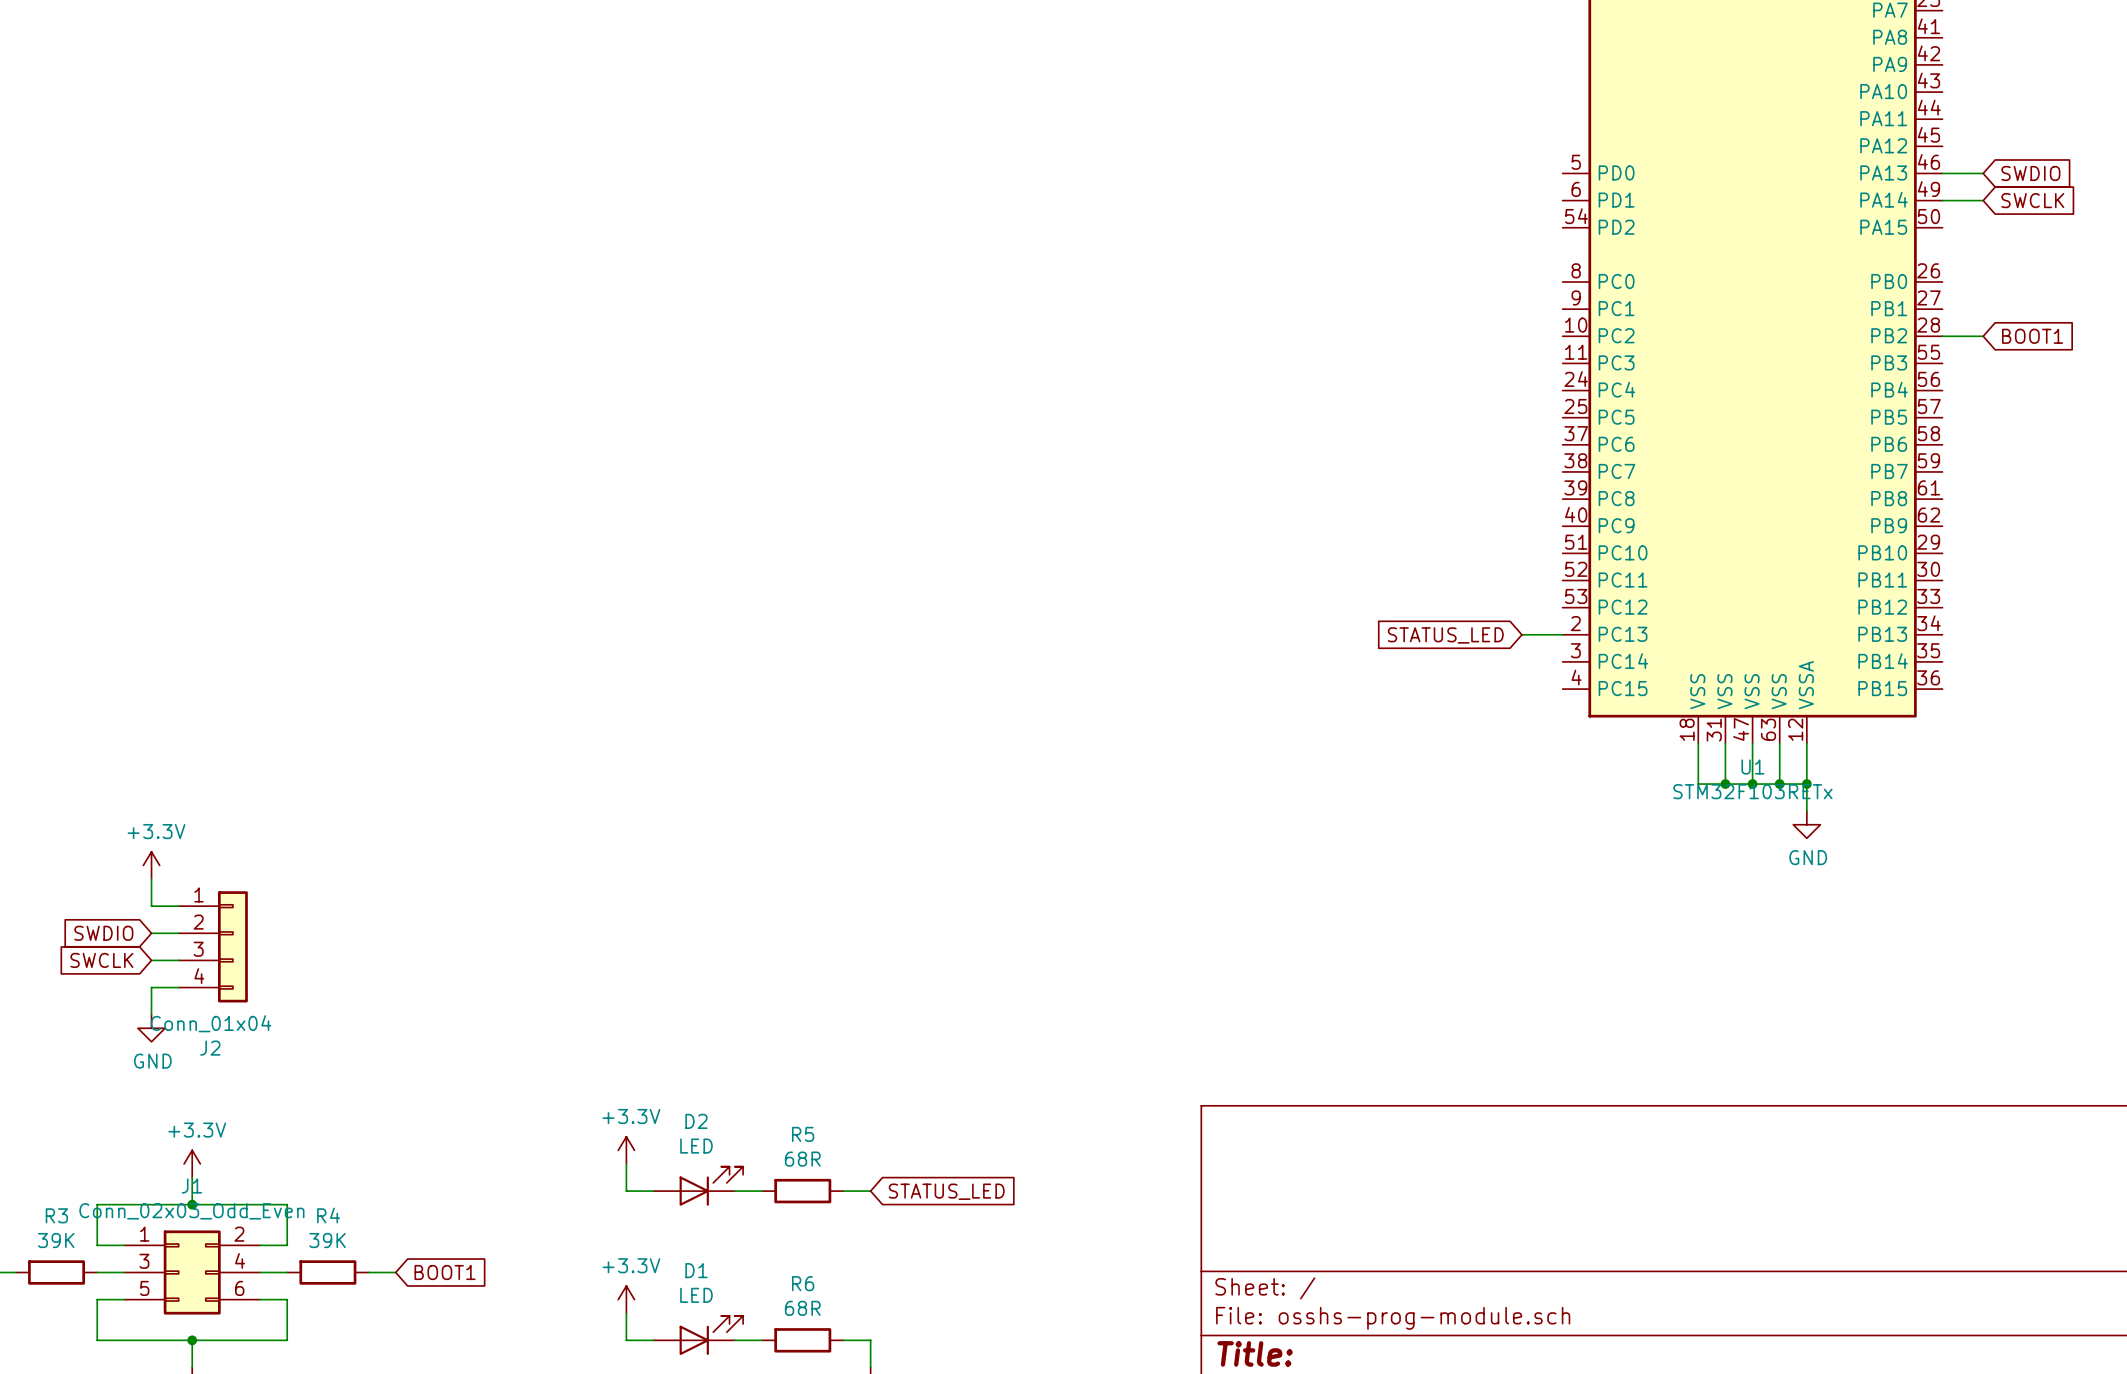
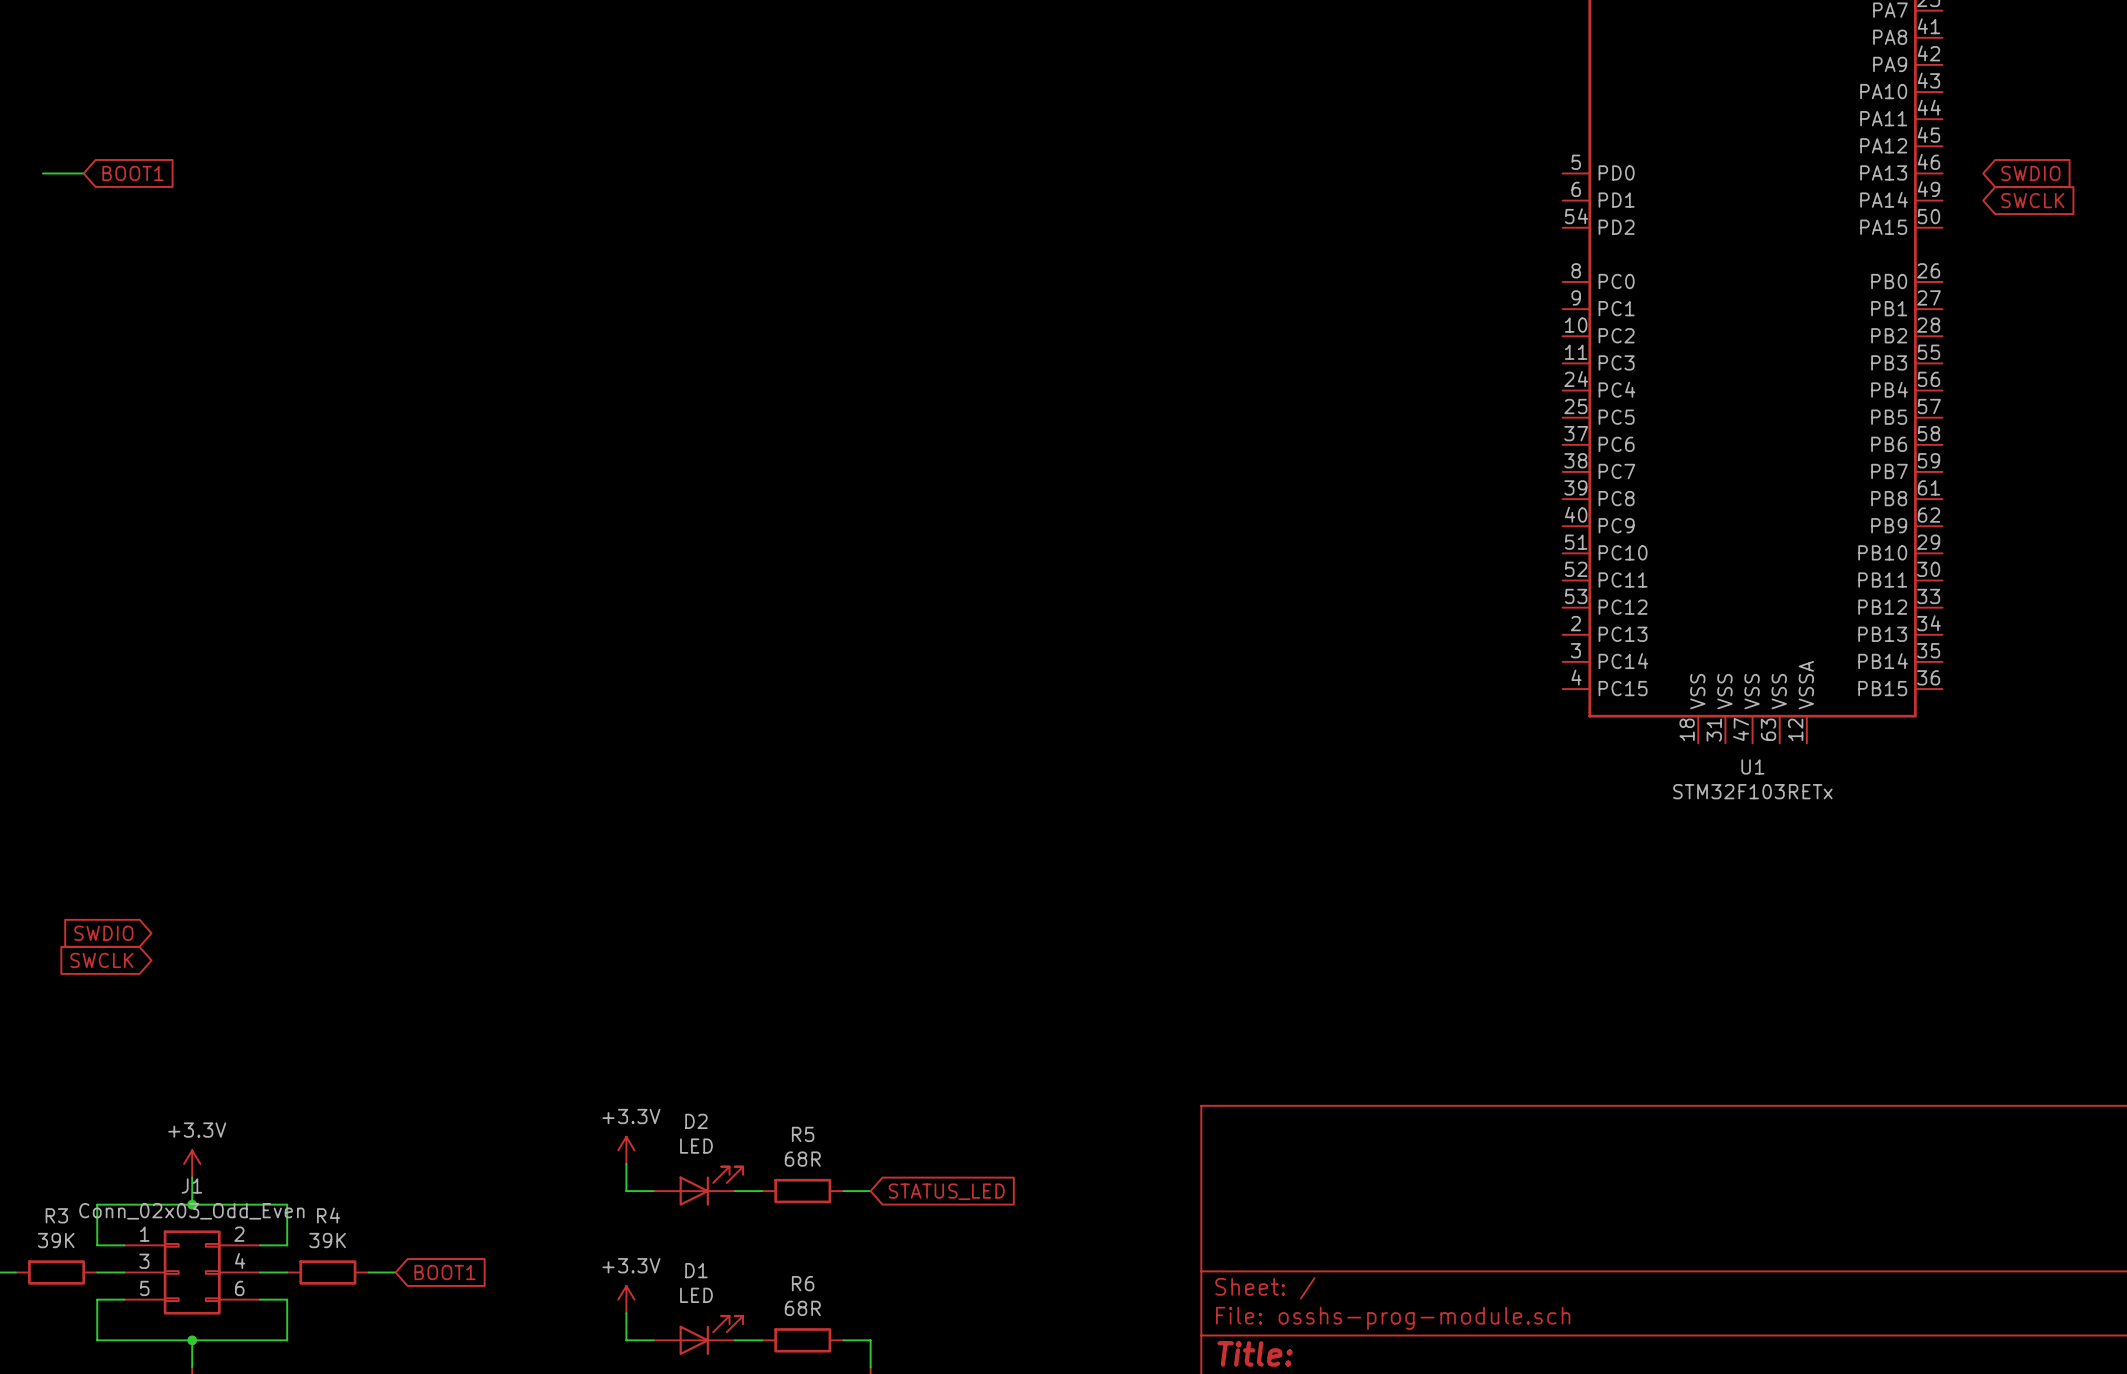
wire: none -> (42, 173) (83, 173)
global label: none -> BOOT1 (132, 173)
wire: (1942, 173) (1983, 173) -> none
wire: (1942, 200) (1983, 200) -> none
wire: (1942, 336) (1983, 336) -> none
global label: BOOT1 (2032, 336) -> none
wire: (1521, 634) (1562, 634) -> none
global label: STATUS_LED (1445, 635) -> none
wire: (1698, 743) (1698, 784) (1806, 784) -> none
wire: (1725, 743) (1725, 784) -> none
wire: (1752, 743) (1752, 784) -> none
wire: (1779, 743) (1779, 784) -> none
wire: (1806, 743) (1806, 811) -> none
junction: (1725, 784) -> none
junction: (1752, 784) -> none
junction: (1779, 784) -> none
junction: (1806, 784) -> none
power symbol: GND (1806, 824) -> none
power symbol: +3.3V (151, 865) -> none
wire: (151, 879) (151, 906) (178, 906) -> none
wire: (151, 933) (178, 933) -> none
J2: Conn_01x04 (213, 946) -> none
wire: (151, 960) (178, 960) -> none
wire: (178, 987) (151, 987) (151, 1014) -> none
power symbol: GND (151, 1028) -> none

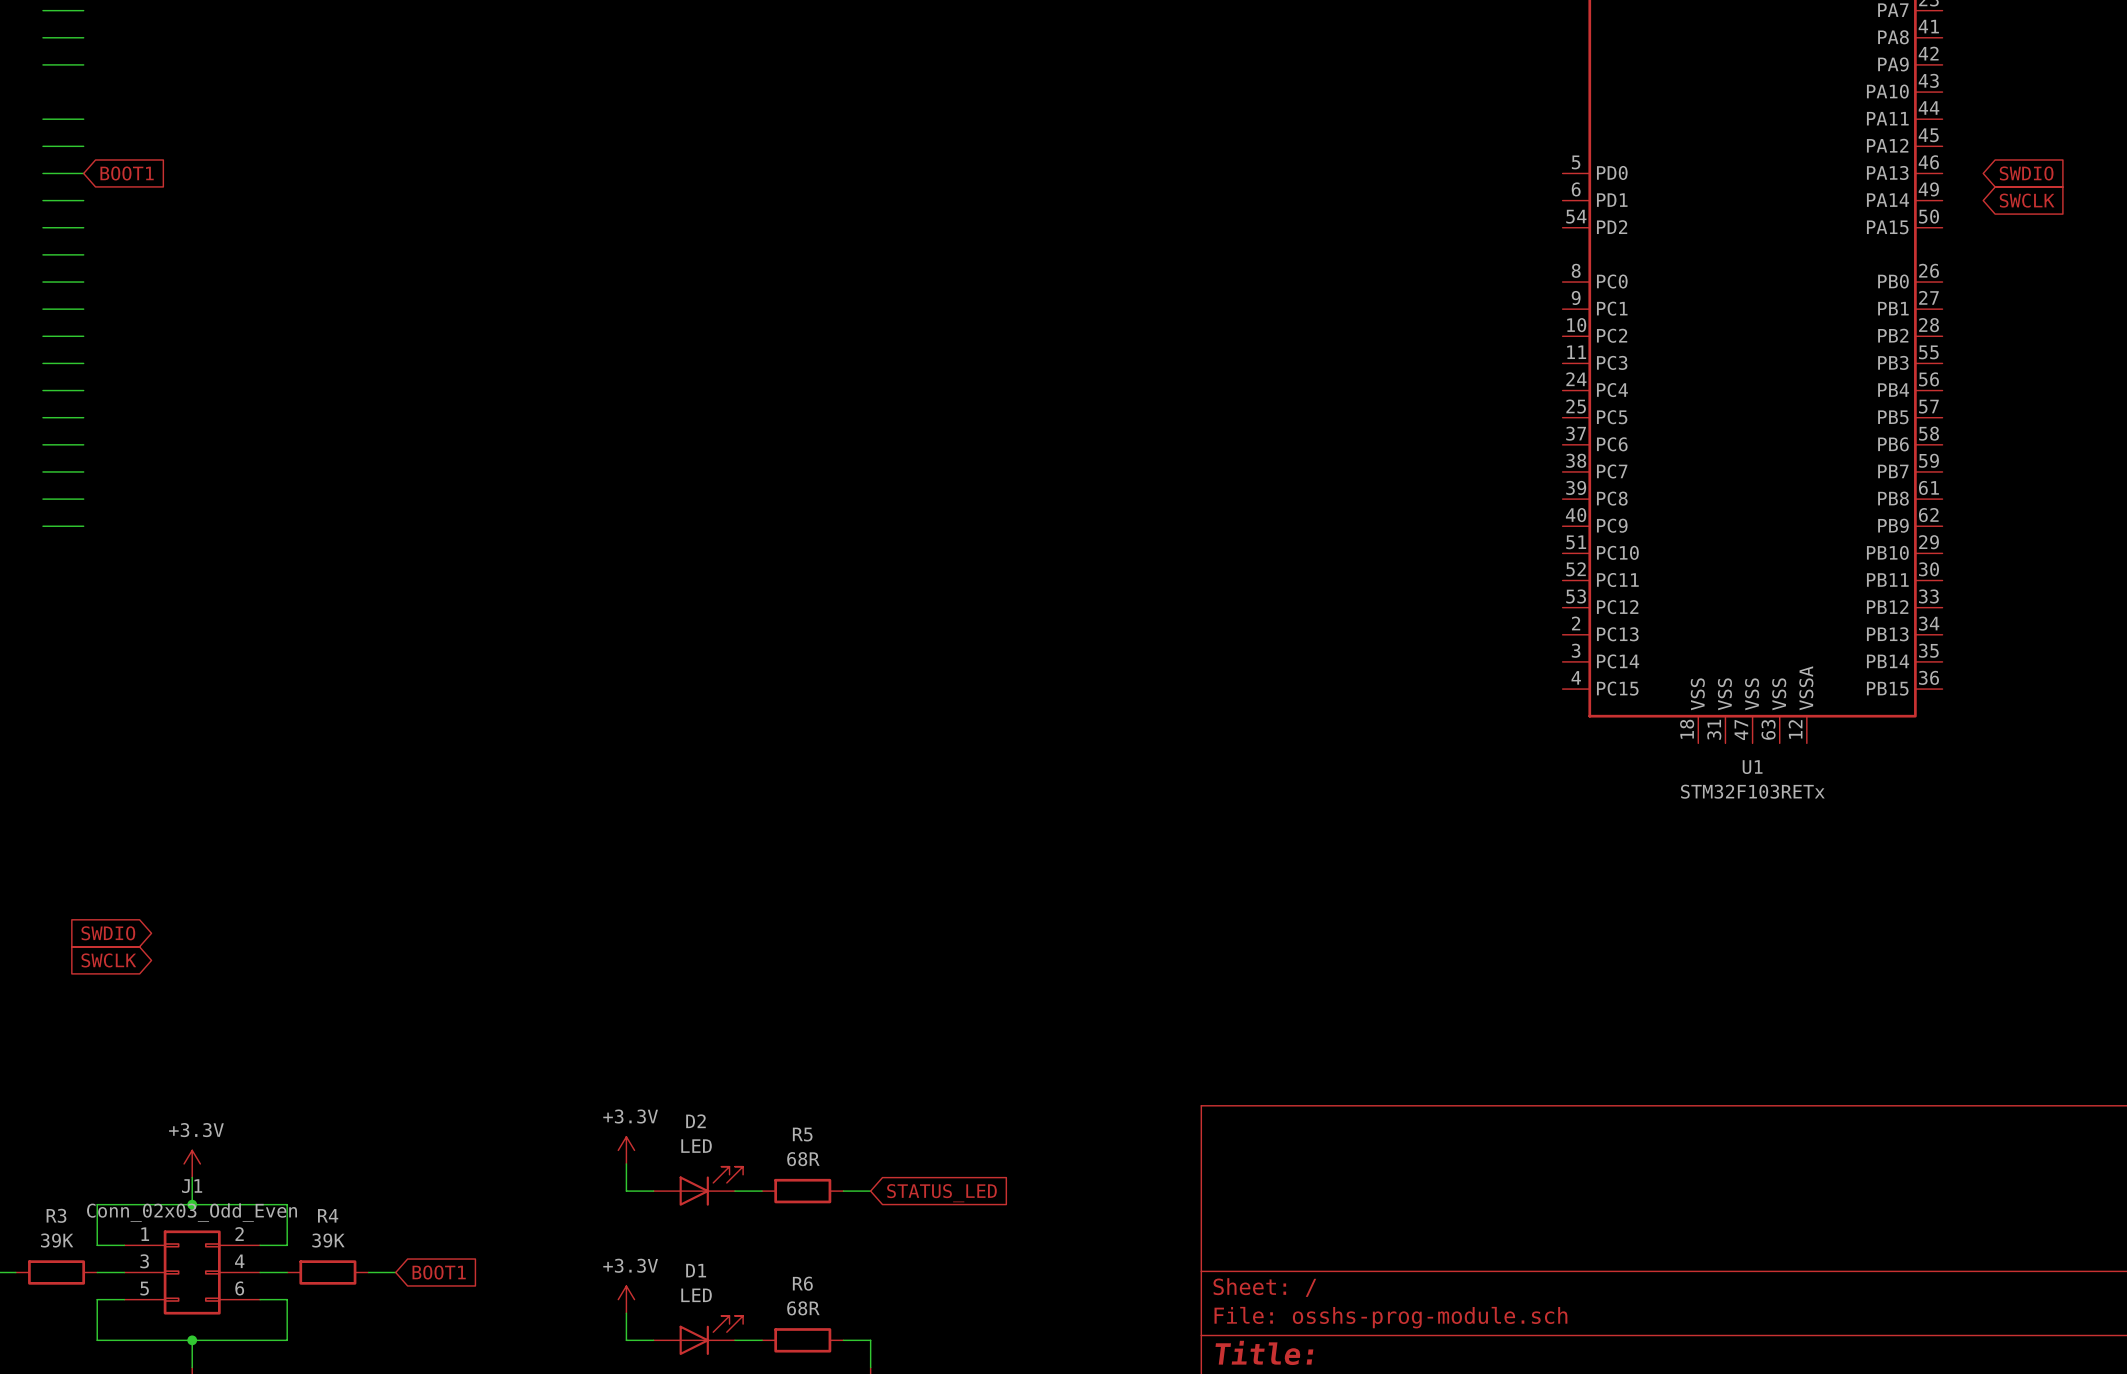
wire: none -> (42, 10) (83, 10)
wire: none -> (42, 37) (83, 37)
wire: none -> (42, 64) (83, 64)
wire: none -> (42, 119) (83, 119)
wire: none -> (42, 146) (83, 146)
wire: none -> (42, 200) (83, 200)
wire: none -> (42, 227) (83, 227)
wire: none -> (42, 254) (83, 254)
wire: none -> (42, 282) (83, 282)
wire: none -> (42, 309) (83, 309)
wire: none -> (42, 336) (83, 336)
wire: none -> (42, 363) (83, 363)
wire: none -> (42, 390) (83, 390)
wire: none -> (42, 417) (83, 417)
wire: none -> (42, 444) (83, 444)
wire: none -> (42, 471) (83, 471)
wire: none -> (42, 499) (83, 499)
wire: none -> (42, 526) (83, 526)

